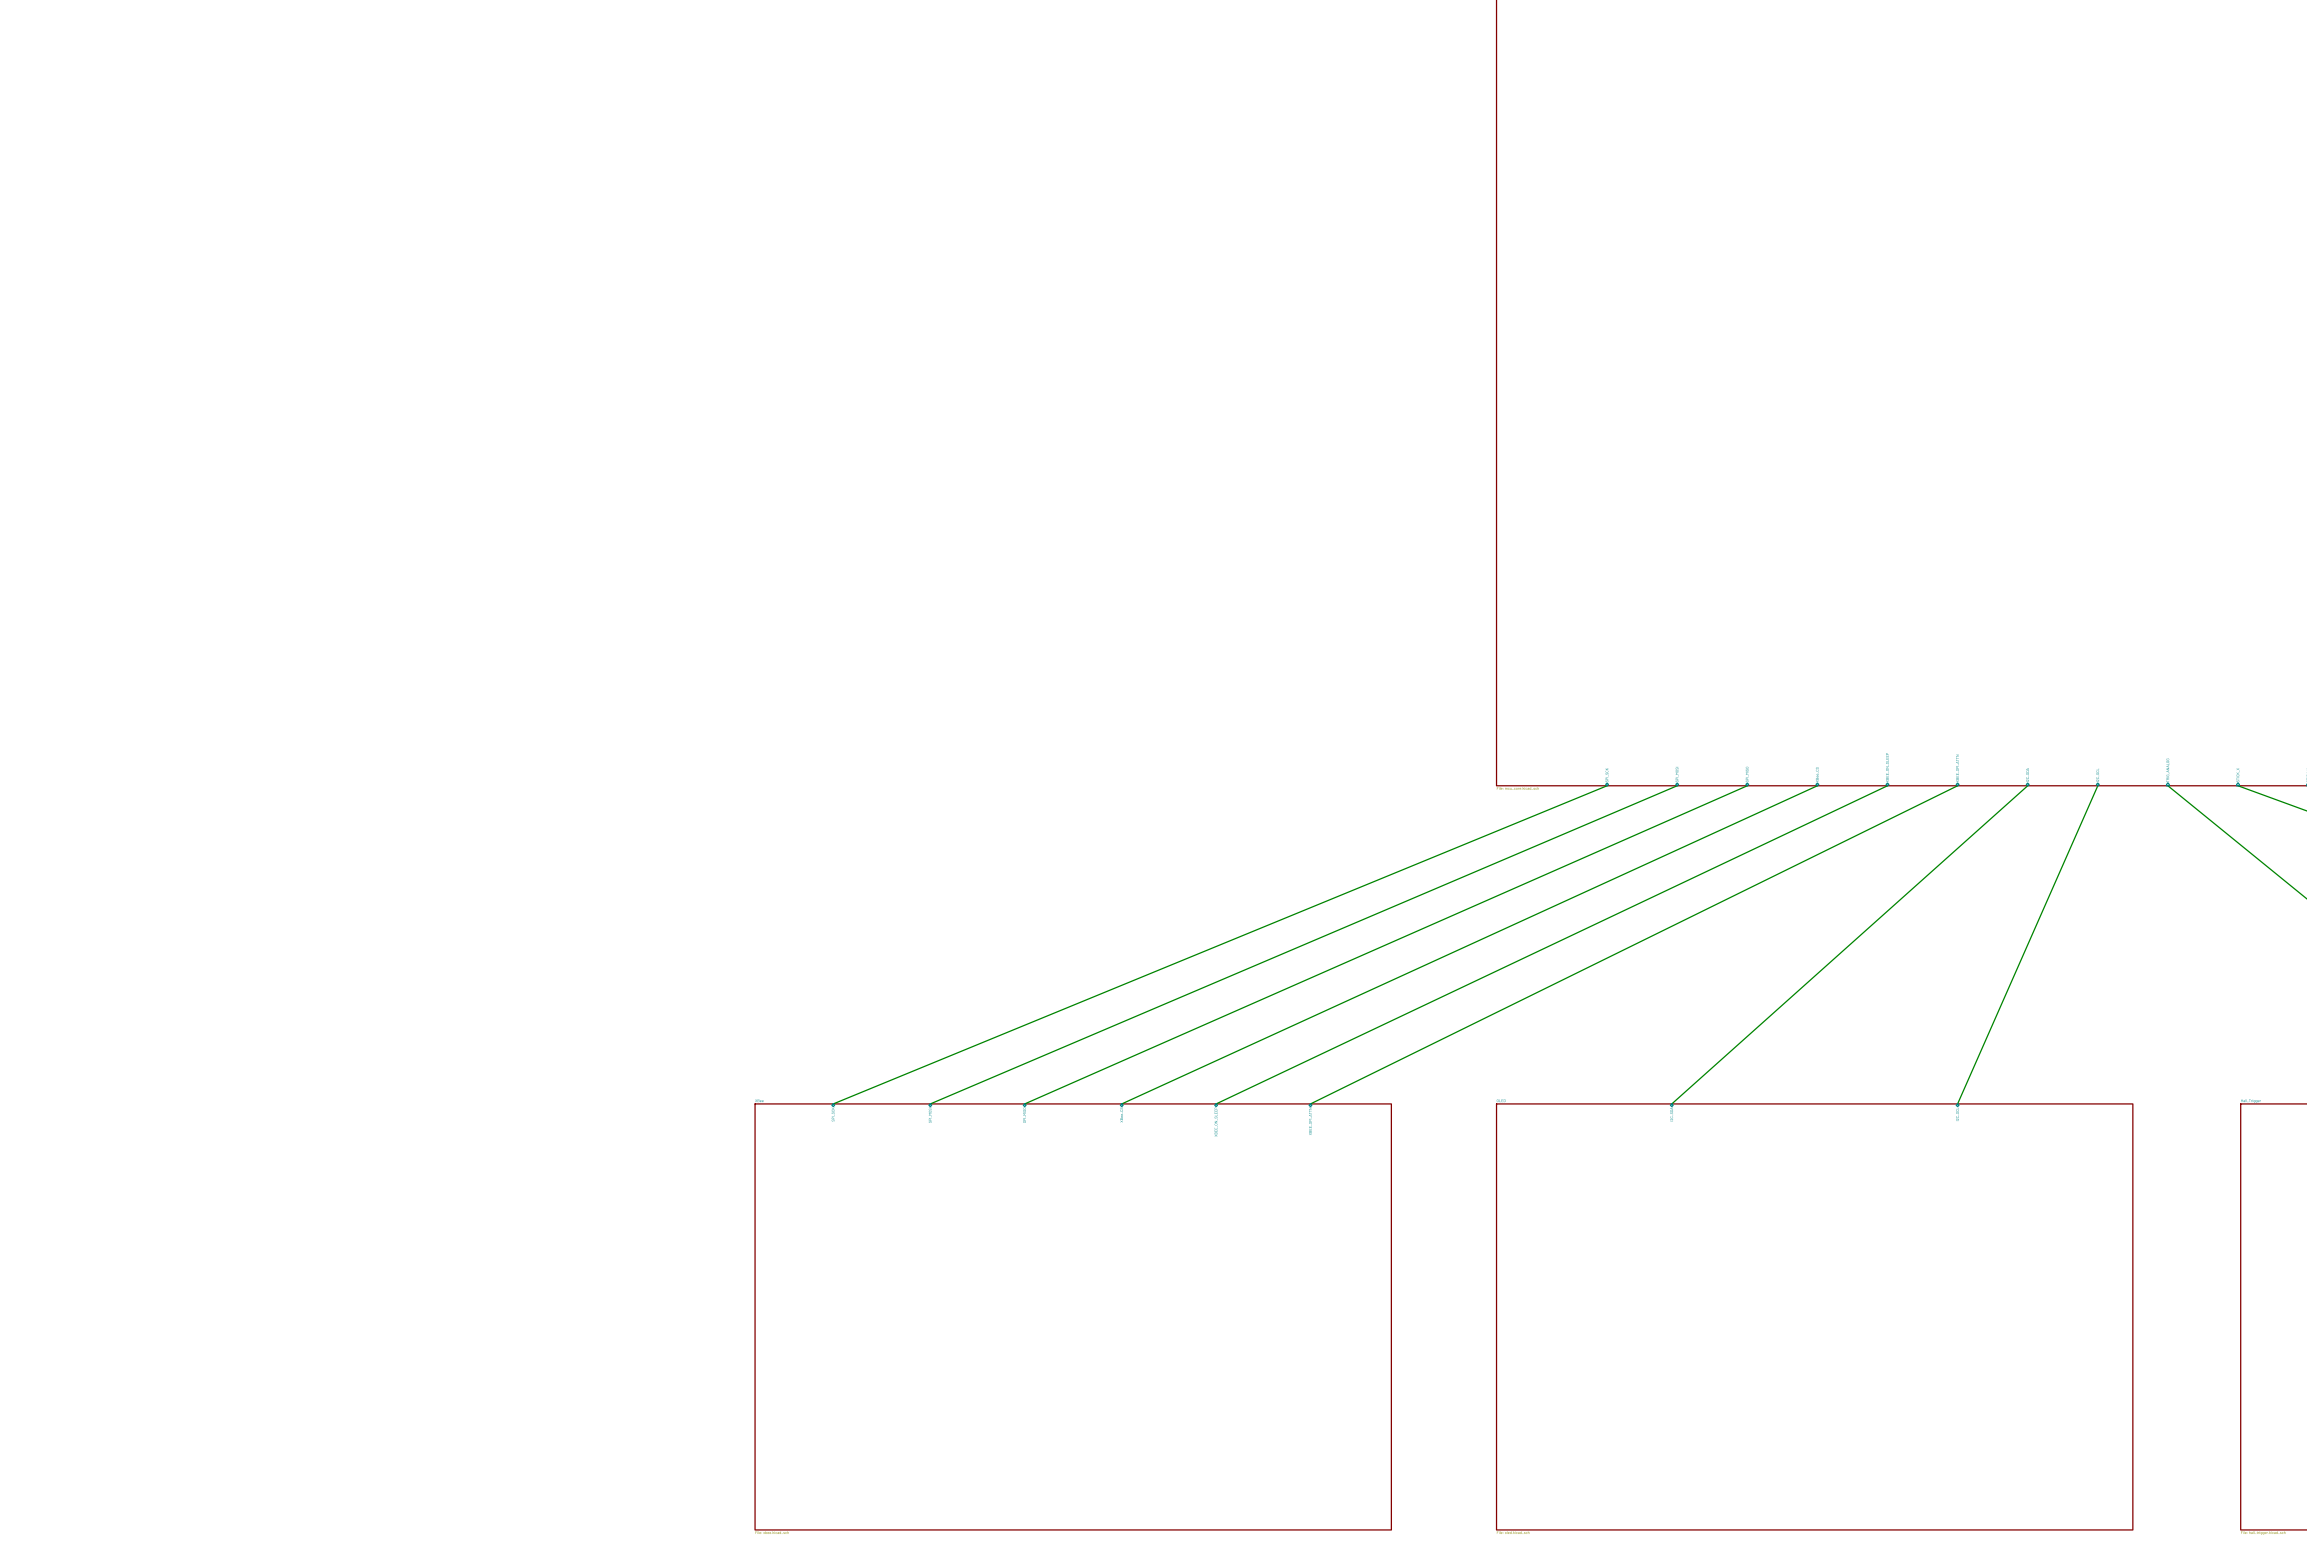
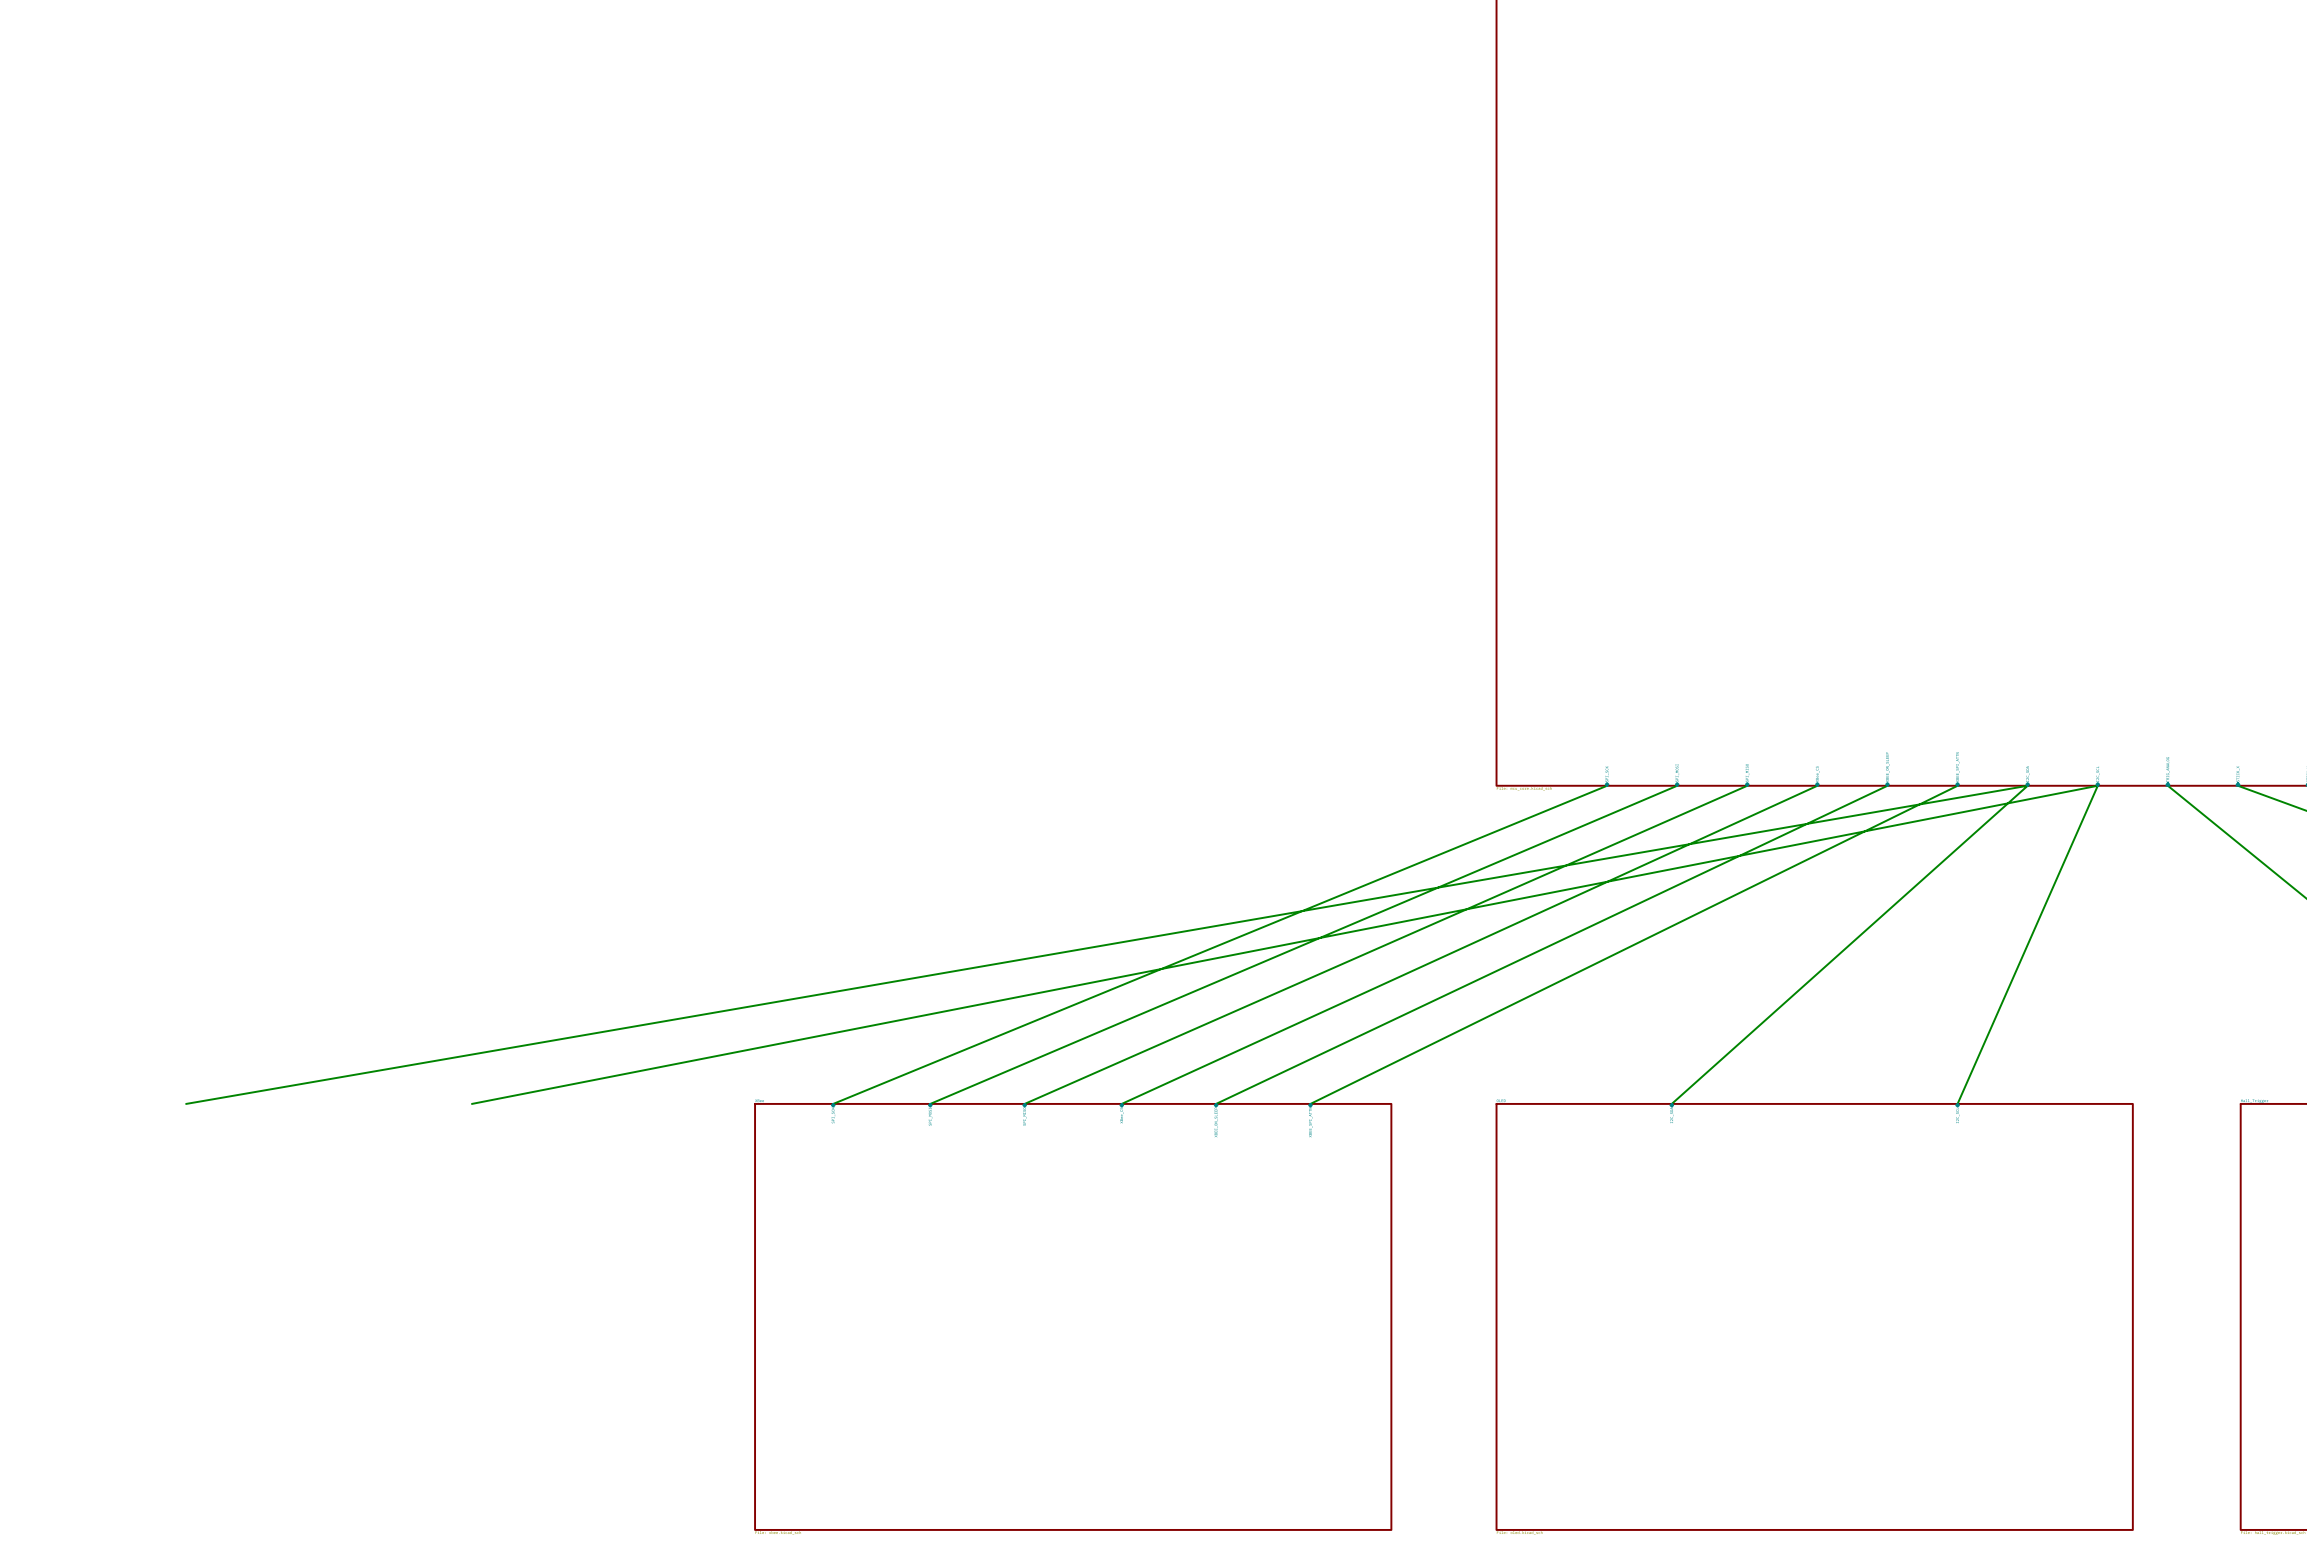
wire: none -> (2027, 785) (186, 1103)
wire: none -> (2097, 785) (471, 1103)

